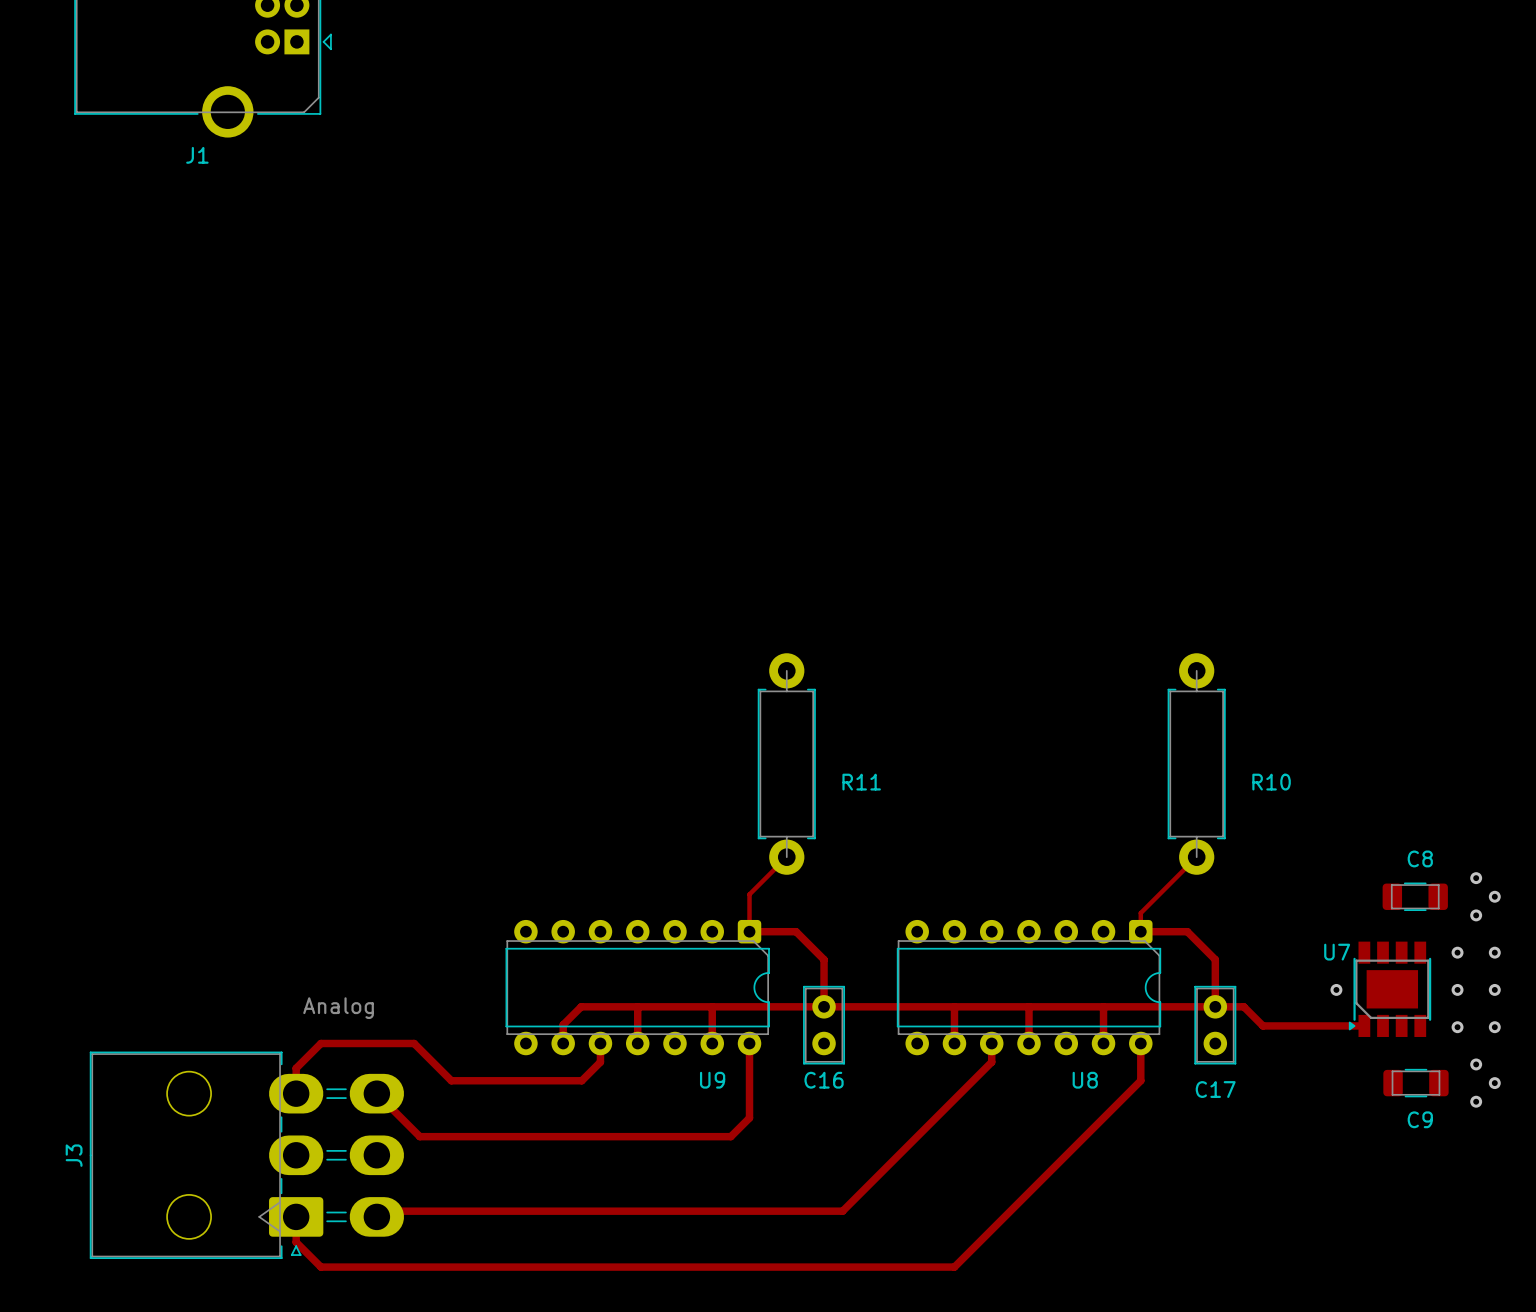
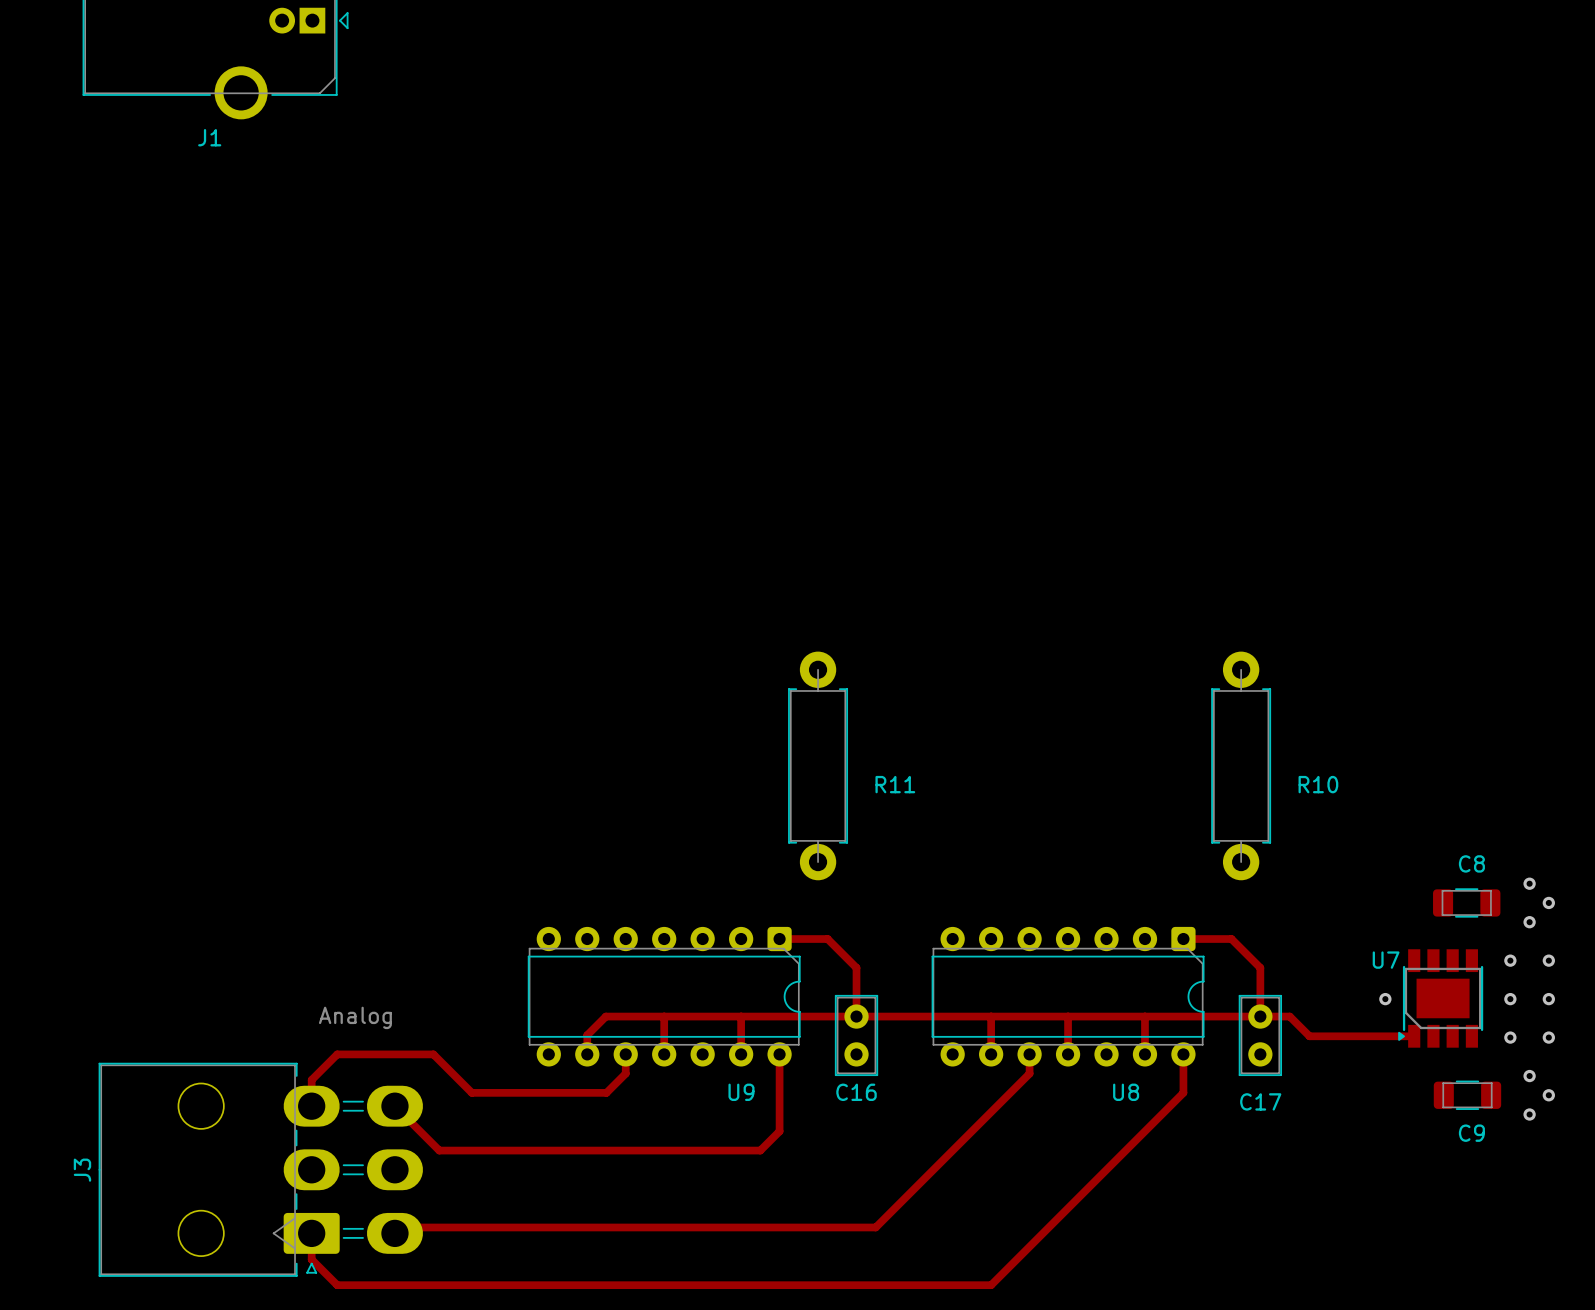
top track: (786, 857) (749, 894) (749, 931) -> none
top track: (1196, 857) (1140, 913) (1140, 931) -> none

